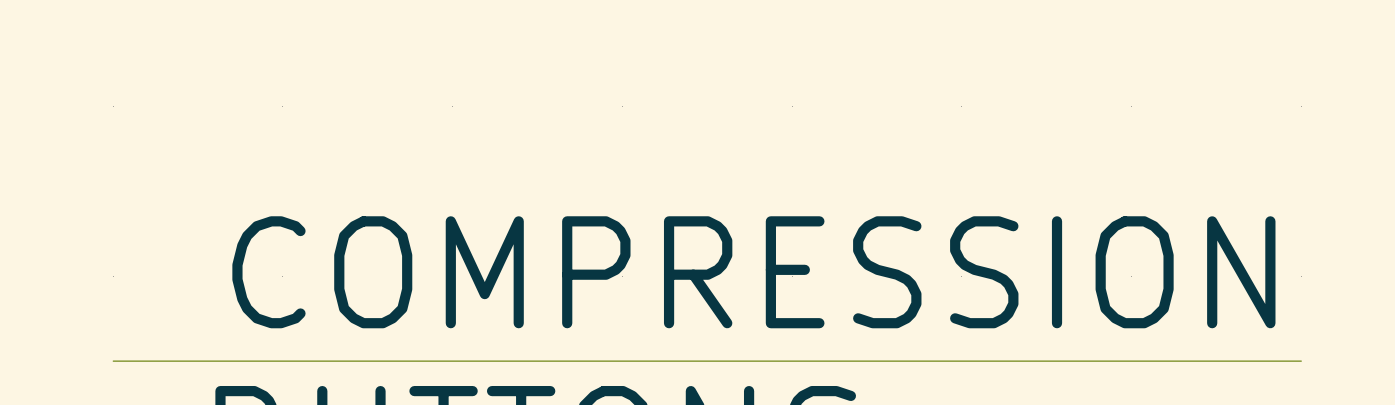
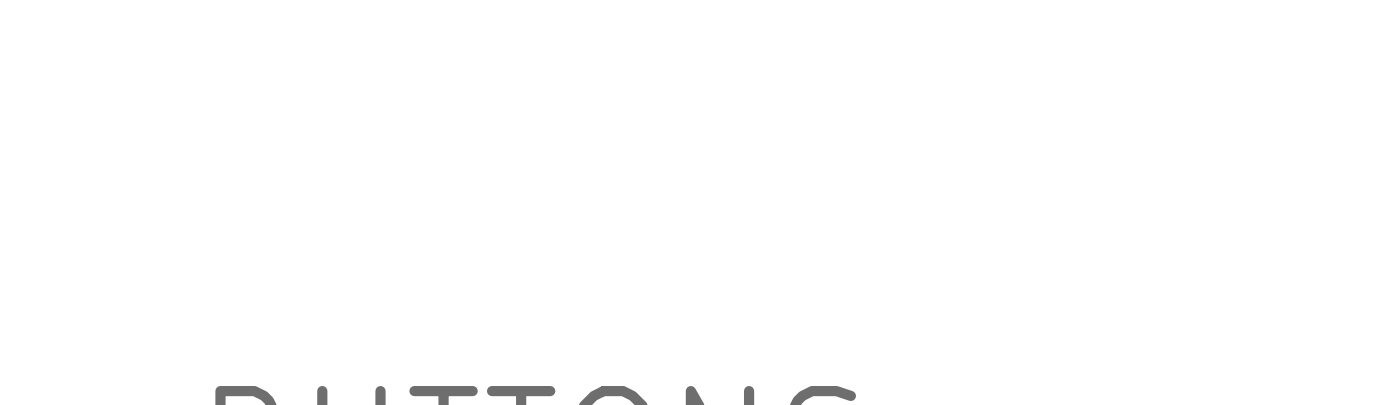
label: COMPRESSION (753, 272) -> none
wire: (113, 361) (1301, 361) -> none

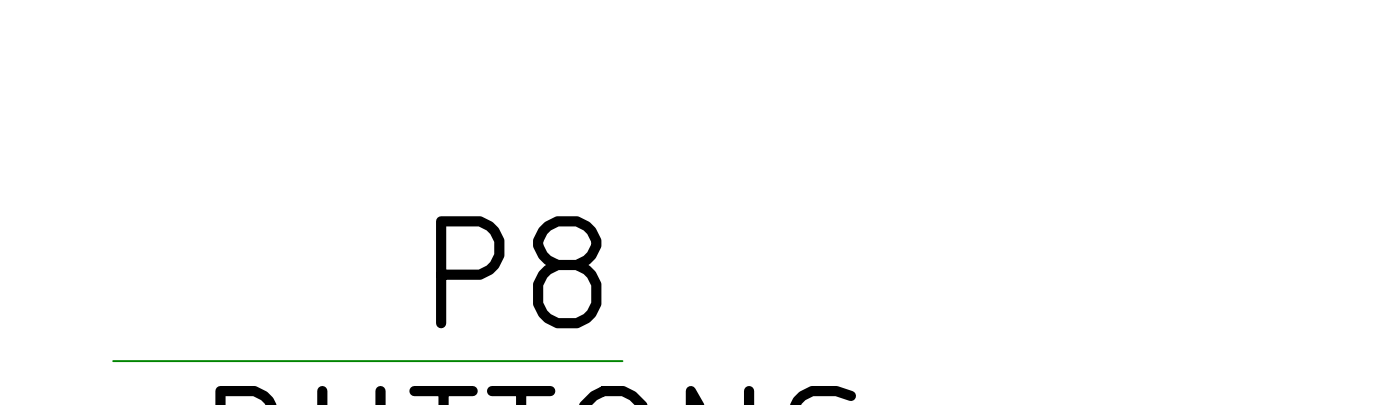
label: none -> P8 (518, 272)
wire: none -> (113, 361) (622, 361)

